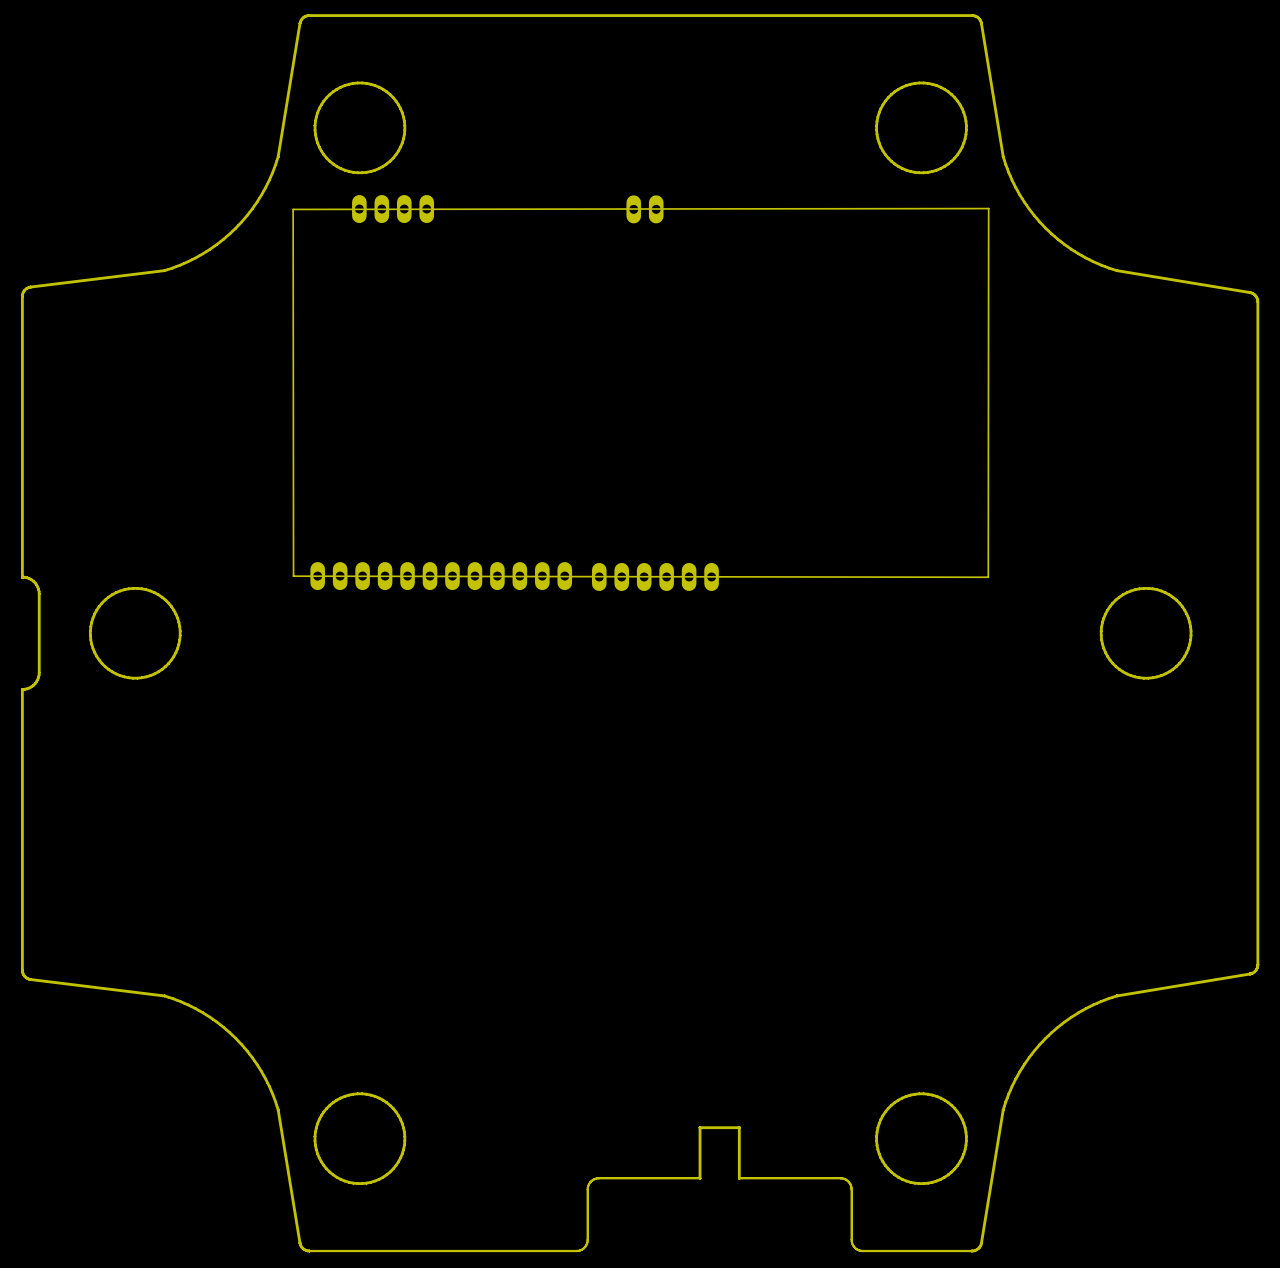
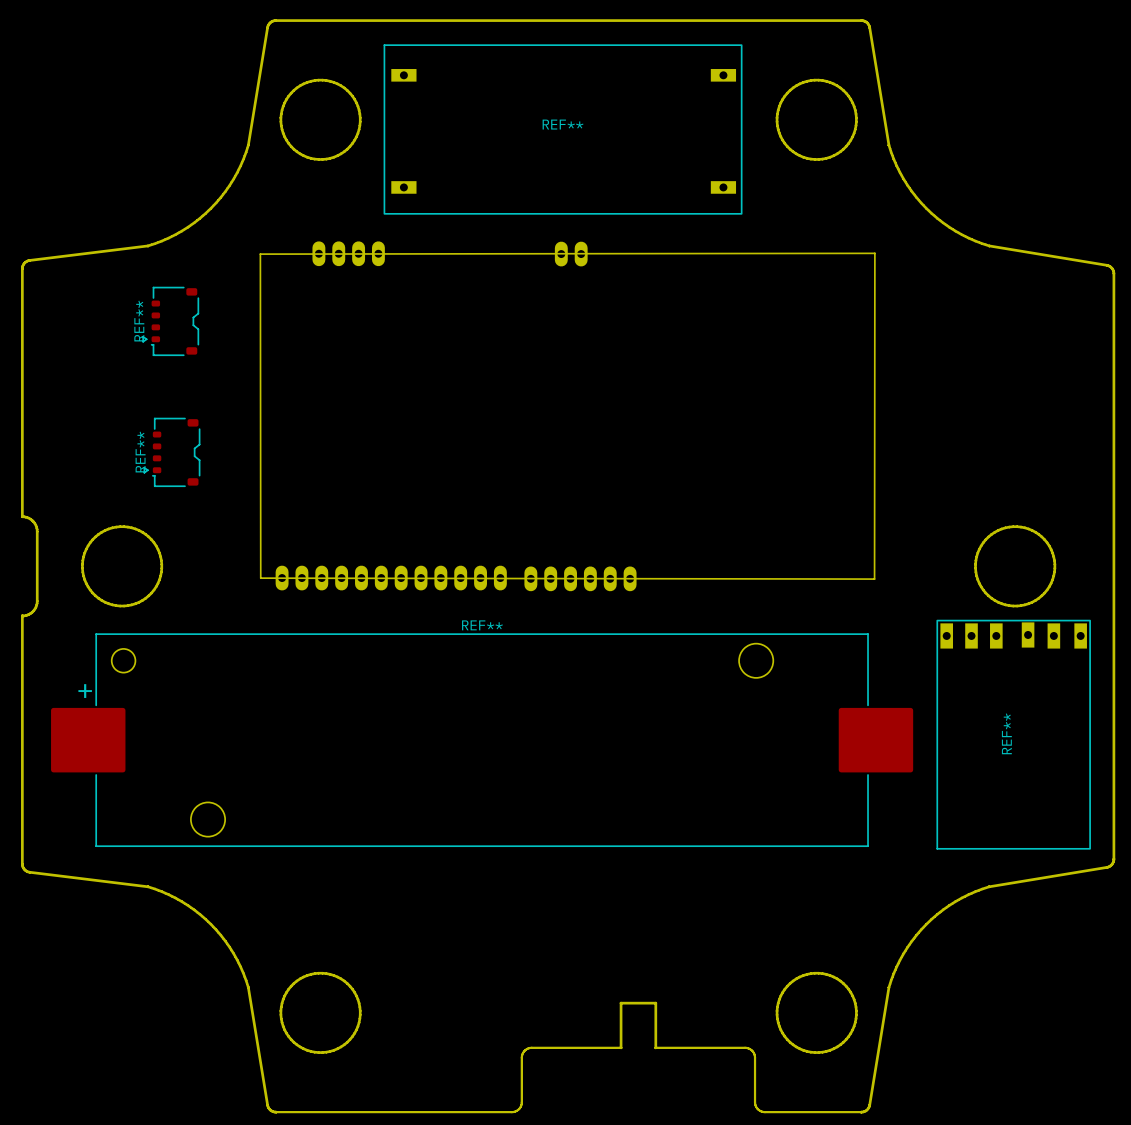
REF**: none -> (563, 129)
REF**: none -> (170, 321)
part position: (640, 393) -> (567, 416)
REF**: none -> (171, 452)
REF**: none -> (1013, 734)
REF**: none -> (482, 740)

